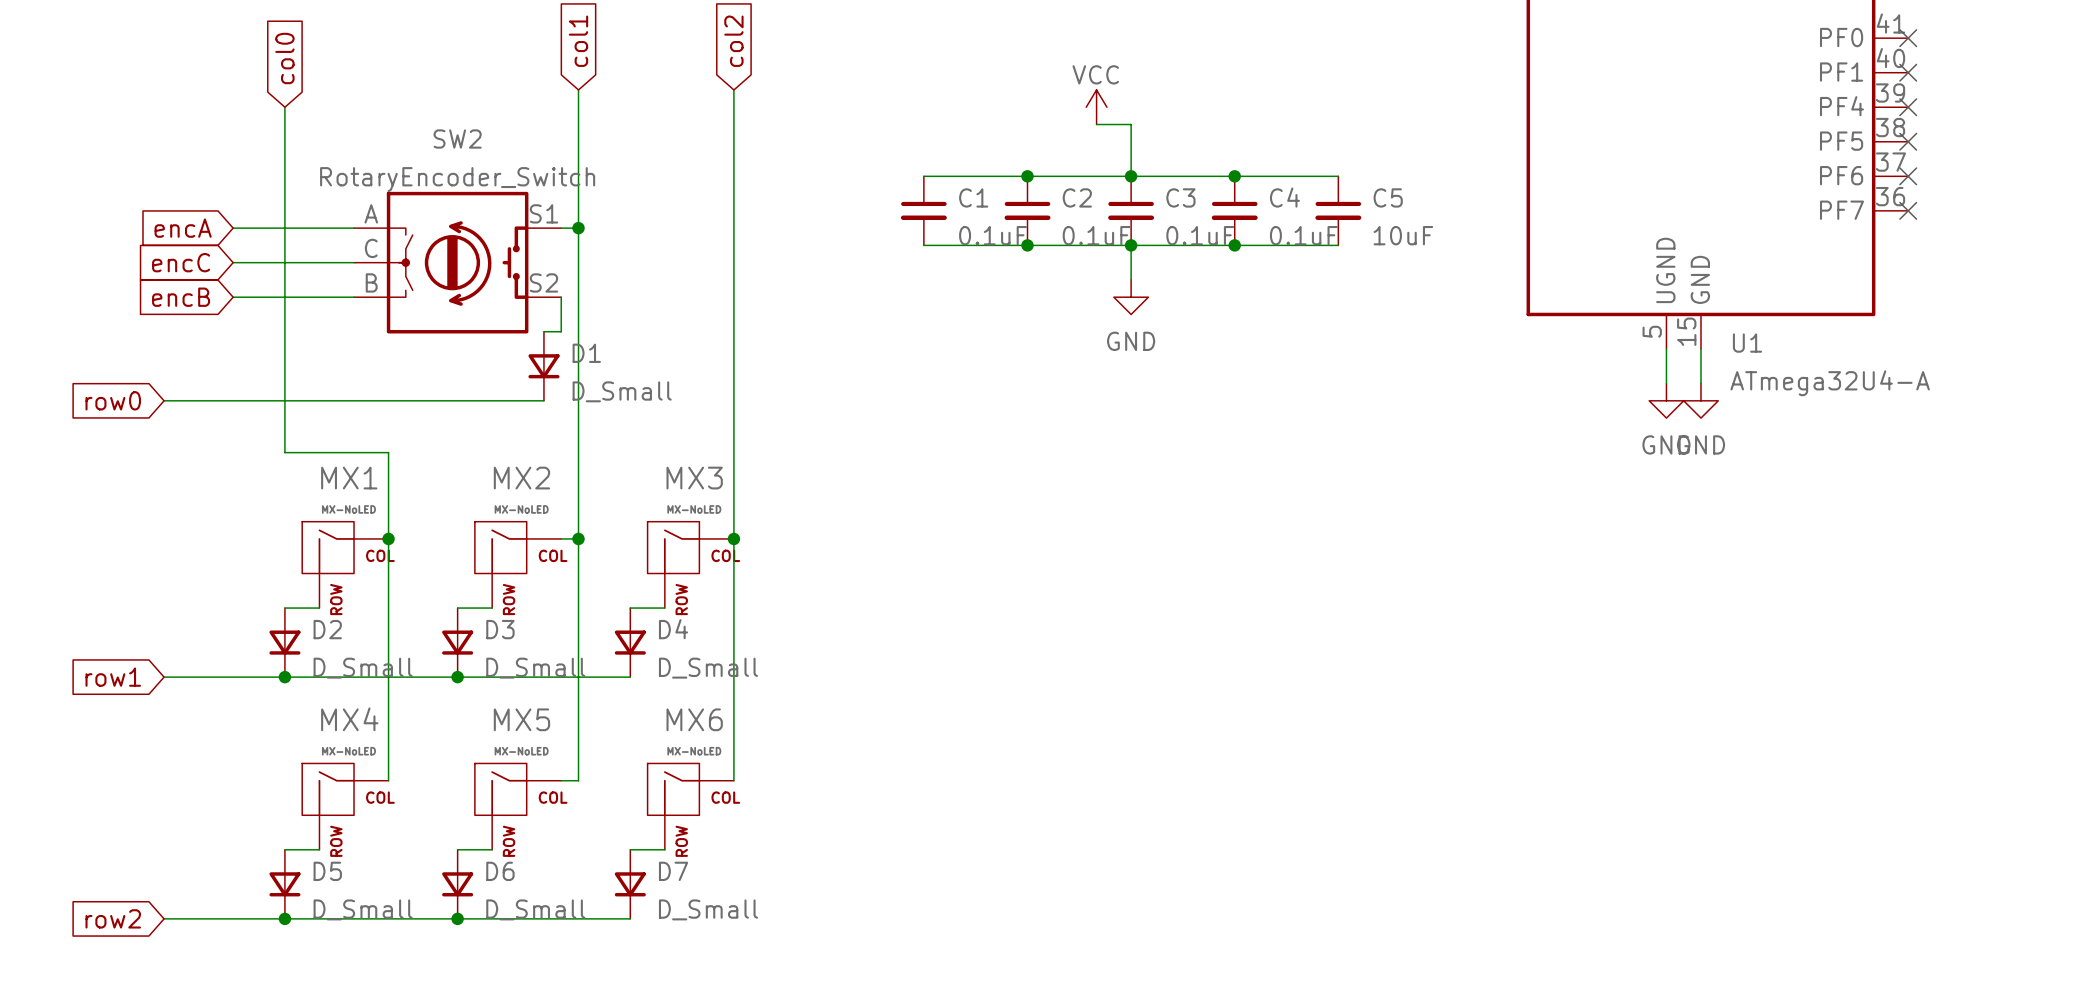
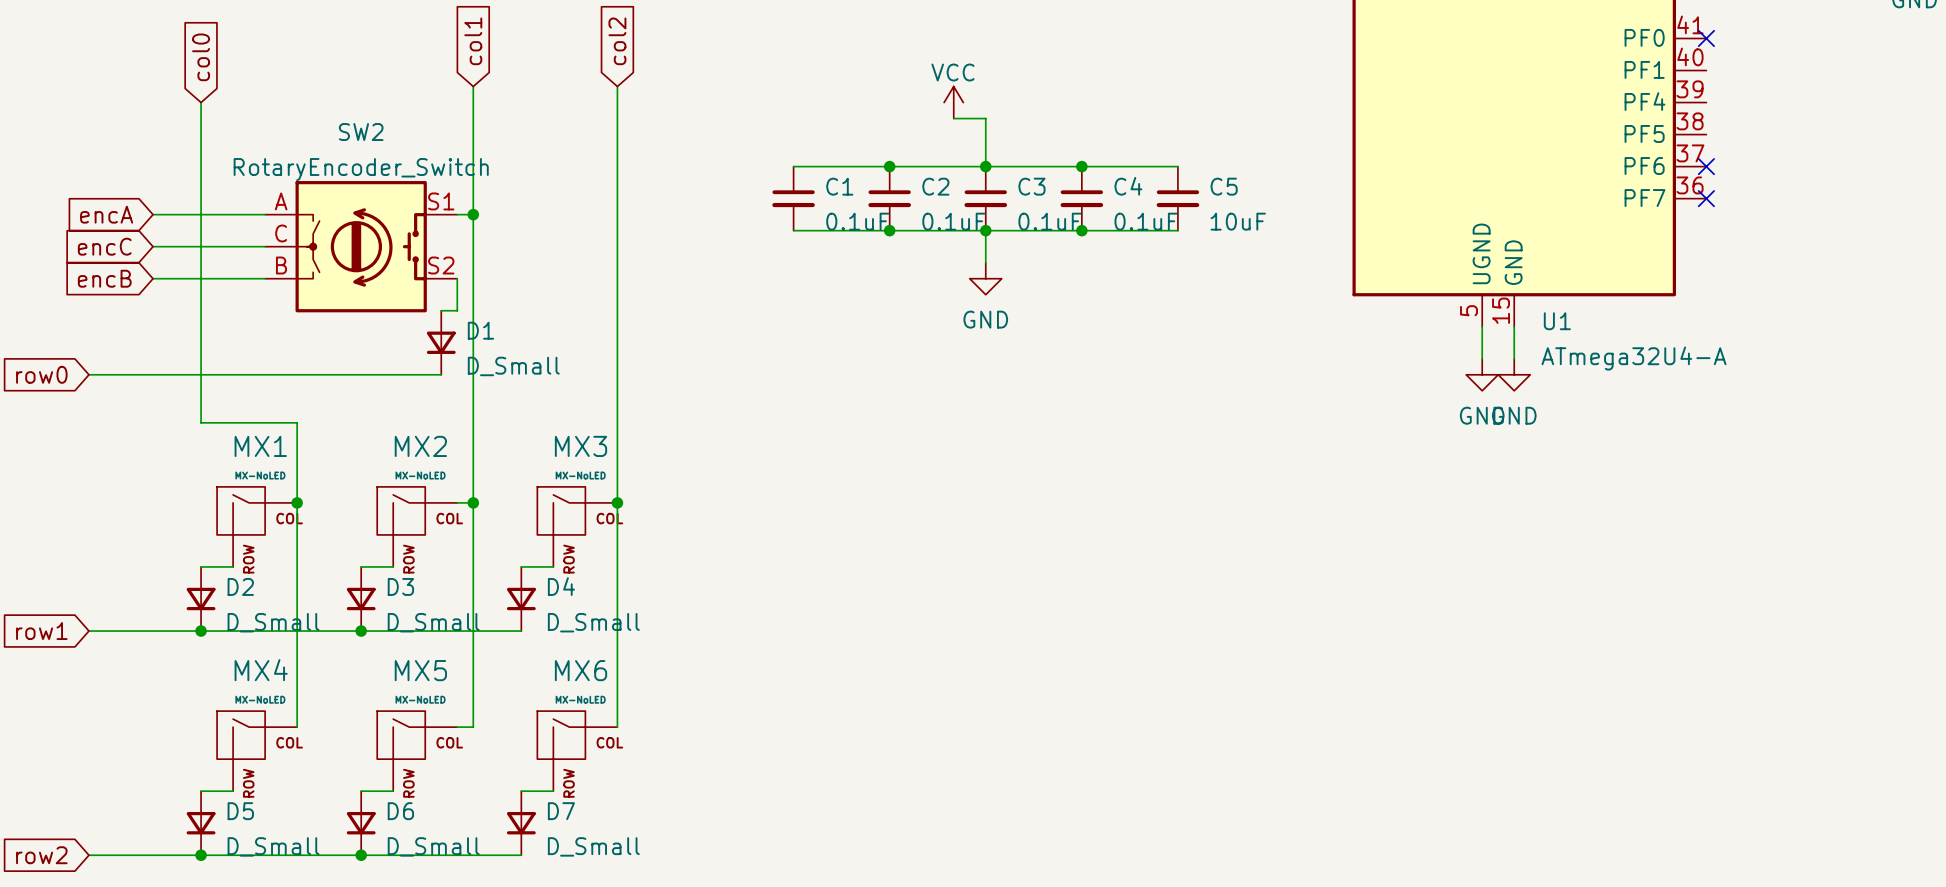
no-connect mark: (1908, 72) -> none
no-connect mark: (1908, 107) -> none
no-connect mark: (1908, 141) -> none

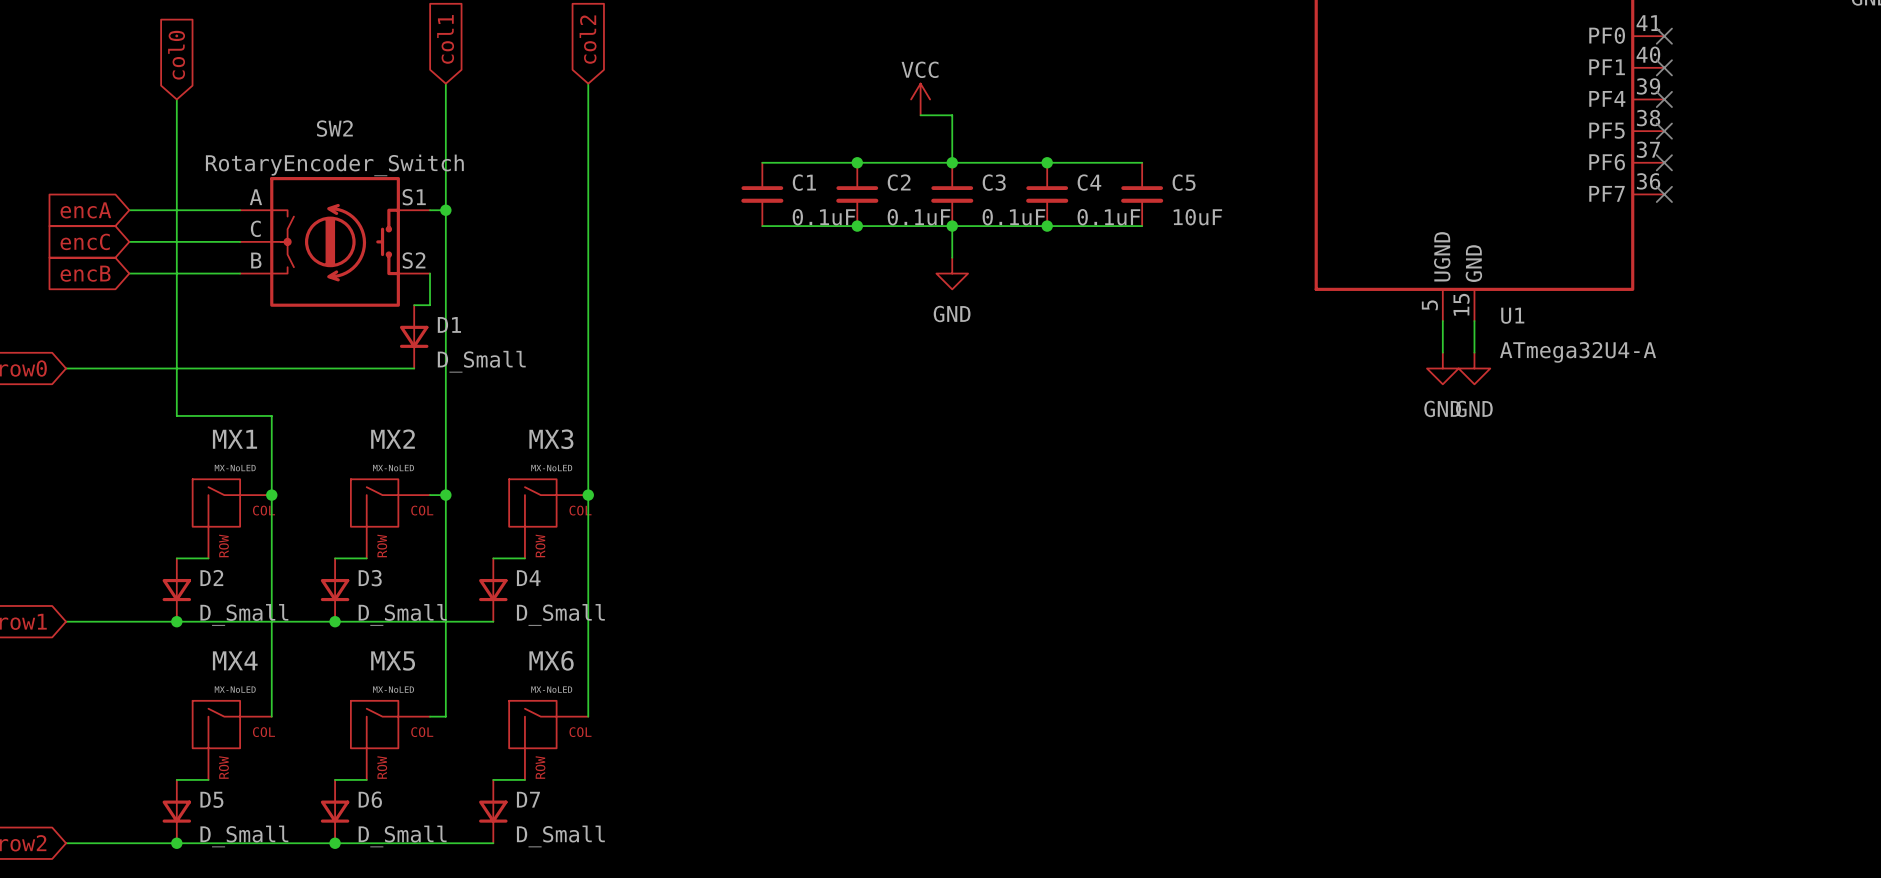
no-connect mark: none -> (1664, 67)
no-connect mark: none -> (1664, 99)
no-connect mark: none -> (1664, 131)

